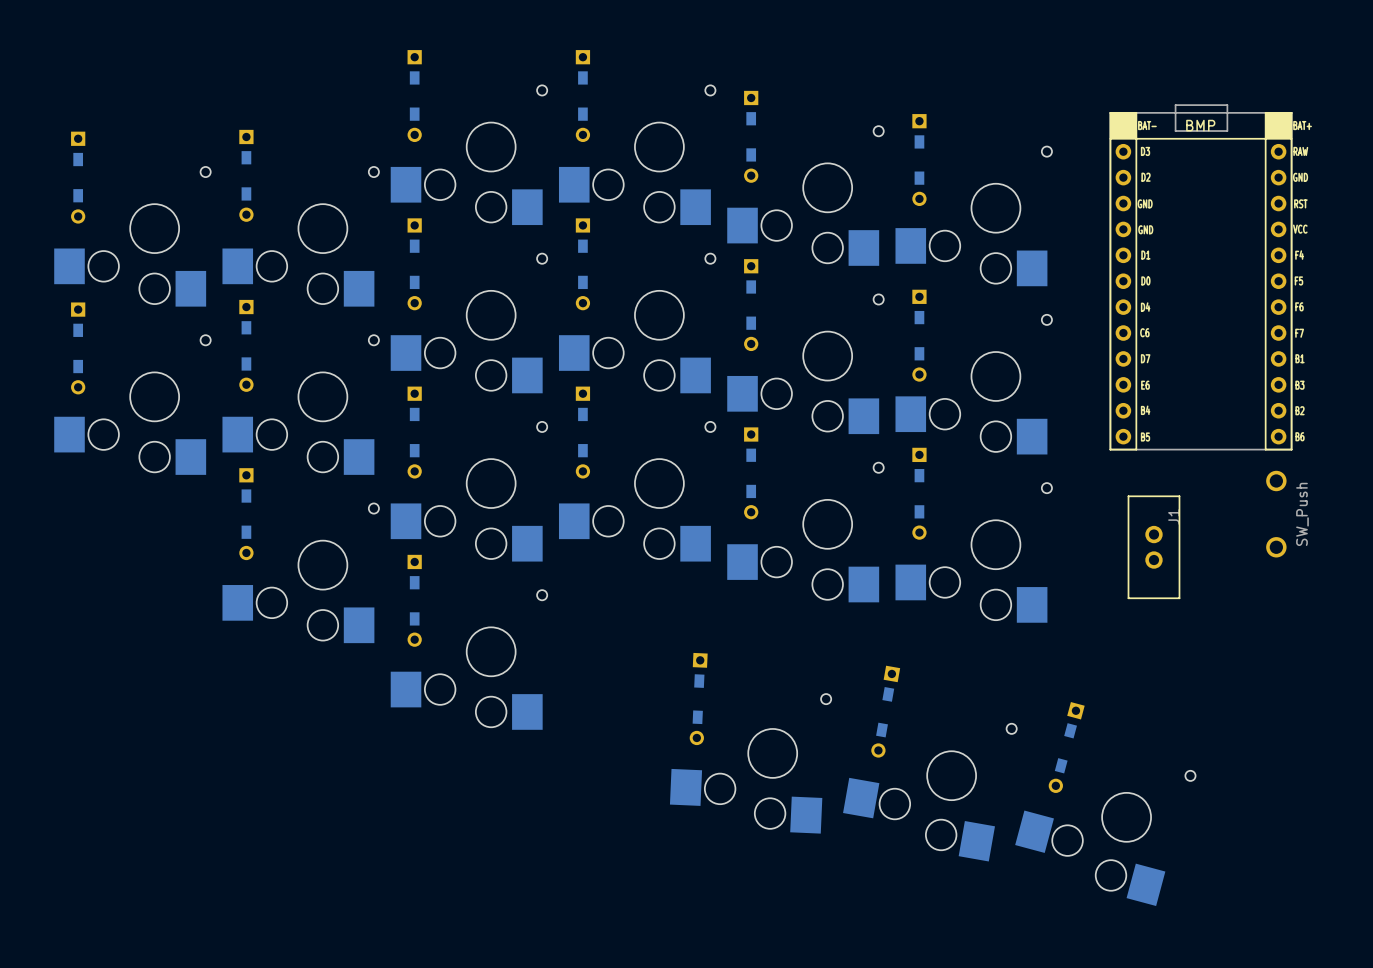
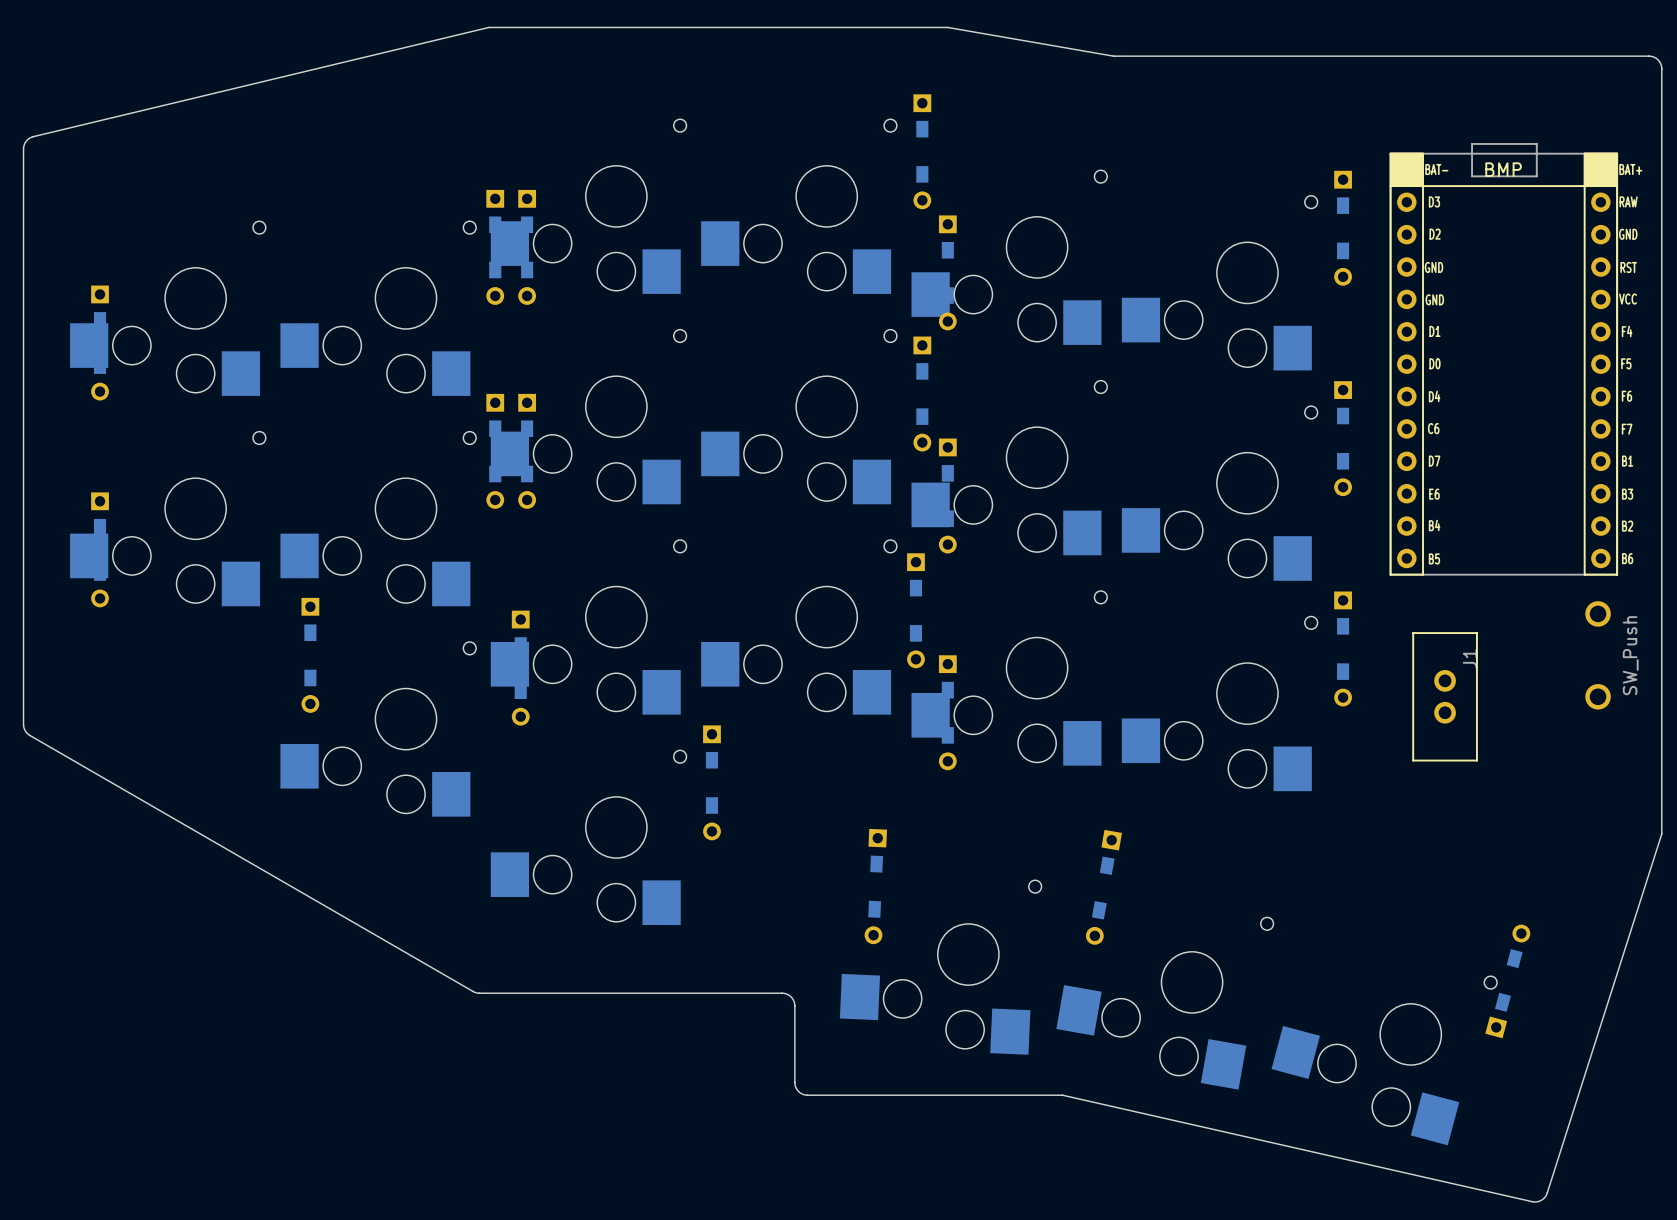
board edge: none -> (488, 27) (33, 136) (25, 142) (23, 149) (23, 724) (26, 733) (475, 992) (787, 994) (792, 998) (794, 1004) (794, 1083) (797, 1090) (803, 1094) (1062, 1095) (1532, 1201) (1538, 1201) (1544, 1198) (1661, 833) (1661, 68) (1658, 59) (1649, 56) (1113, 56) (947, 27) (488, 27)
part: (414, 96) -> none
part: (582, 96) -> none
part position: (751, 136) -> (922, 151)
part: (919, 160) -> none
part: none -> (1343, 228)
part: (246, 175) -> none
part: (78, 177) -> none
part: none -> (495, 247)
part: none -> (527, 247)
part: none -> (947, 272)
part: none -> (100, 343)
part: (414, 264) -> none
part: (582, 264) -> none
part position: (751, 305) -> (922, 394)
part: (919, 335) -> none
part: none -> (1343, 438)
part: (246, 345) -> none
part: (78, 348) -> none
part: none -> (495, 451)
part: none -> (527, 451)
part: none -> (947, 496)
part: none -> (100, 549)
part: (414, 432) -> none
part: (582, 432) -> none
part position: (751, 473) -> (915, 610)
part: (919, 493) -> none
part: none -> (1343, 648)
part: none -> (520, 668)
part: none -> (947, 712)
part: (414, 600) -> none
part: none -> (711, 782)
part position: (885, 711) -> (1103, 887)
part rotation: 0° (1066, 747) -> 180° (1507, 981)
part position: (1066, 747) -> (1507, 981)

